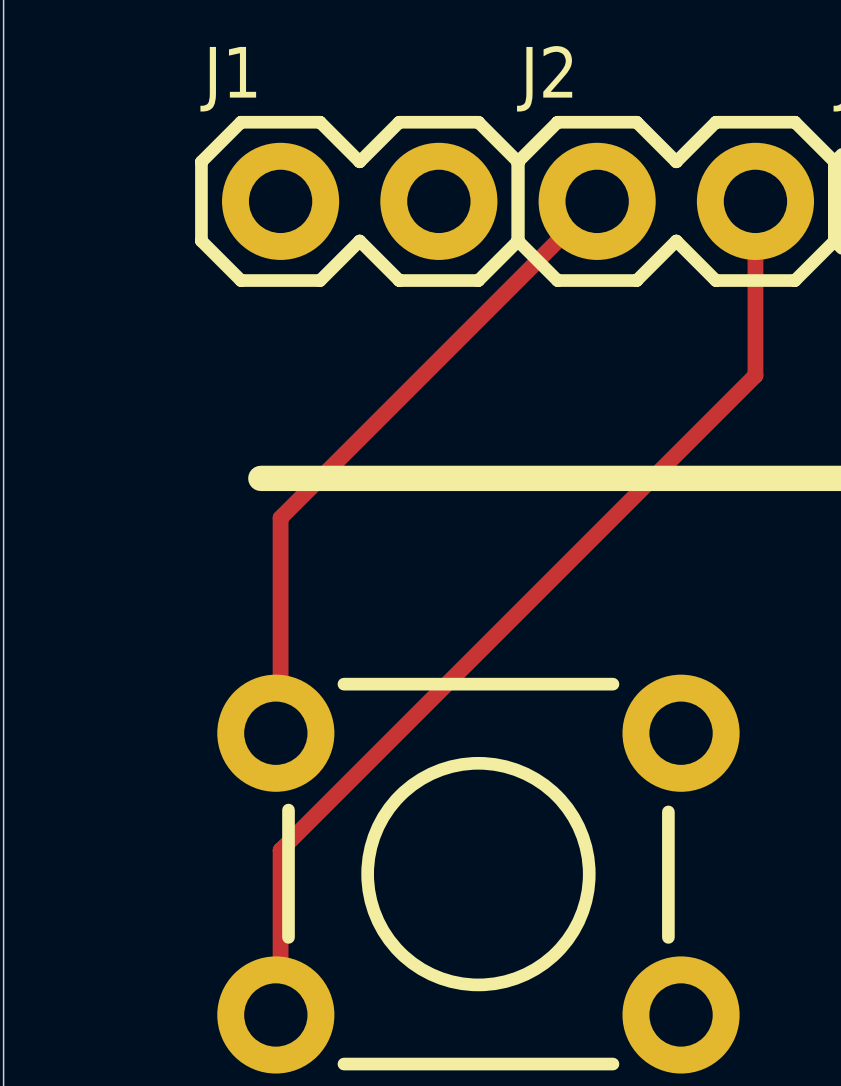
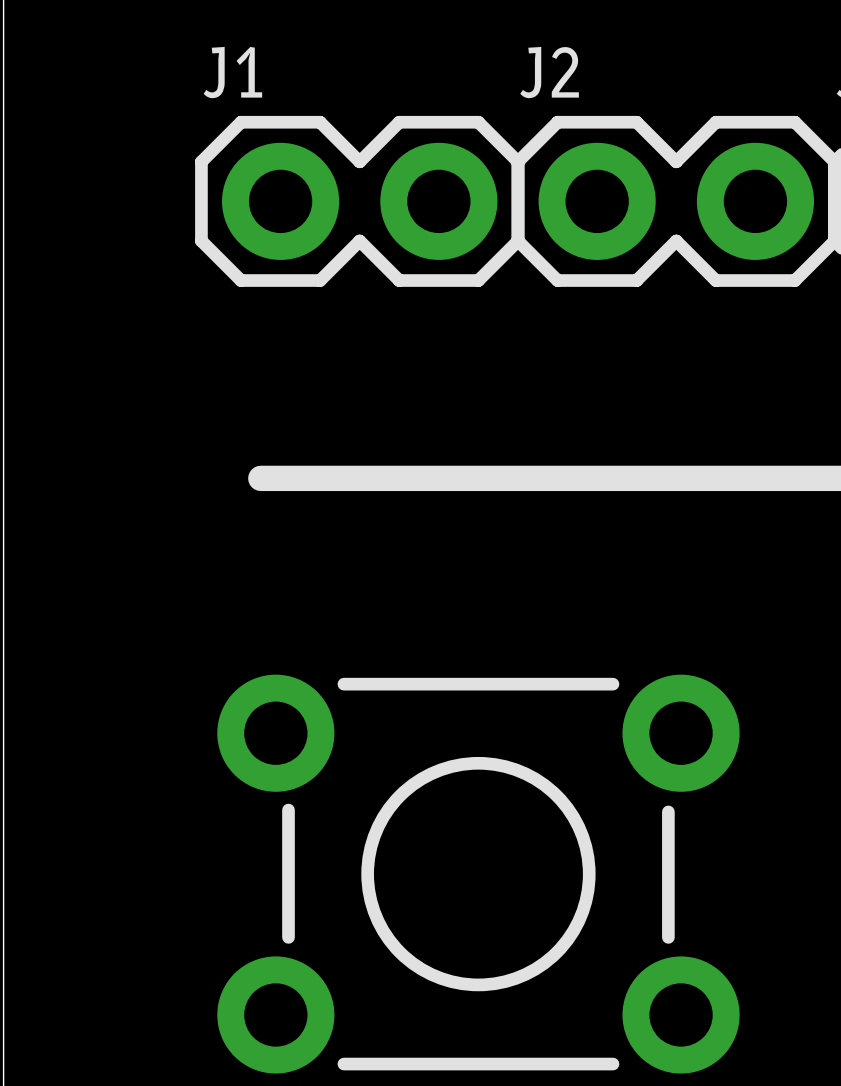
track: (597, 201) (280, 517) (280, 731) (275, 733) -> none
track: (755, 201) (755, 375) (280, 850) (280, 1008) (275, 1014) -> none

